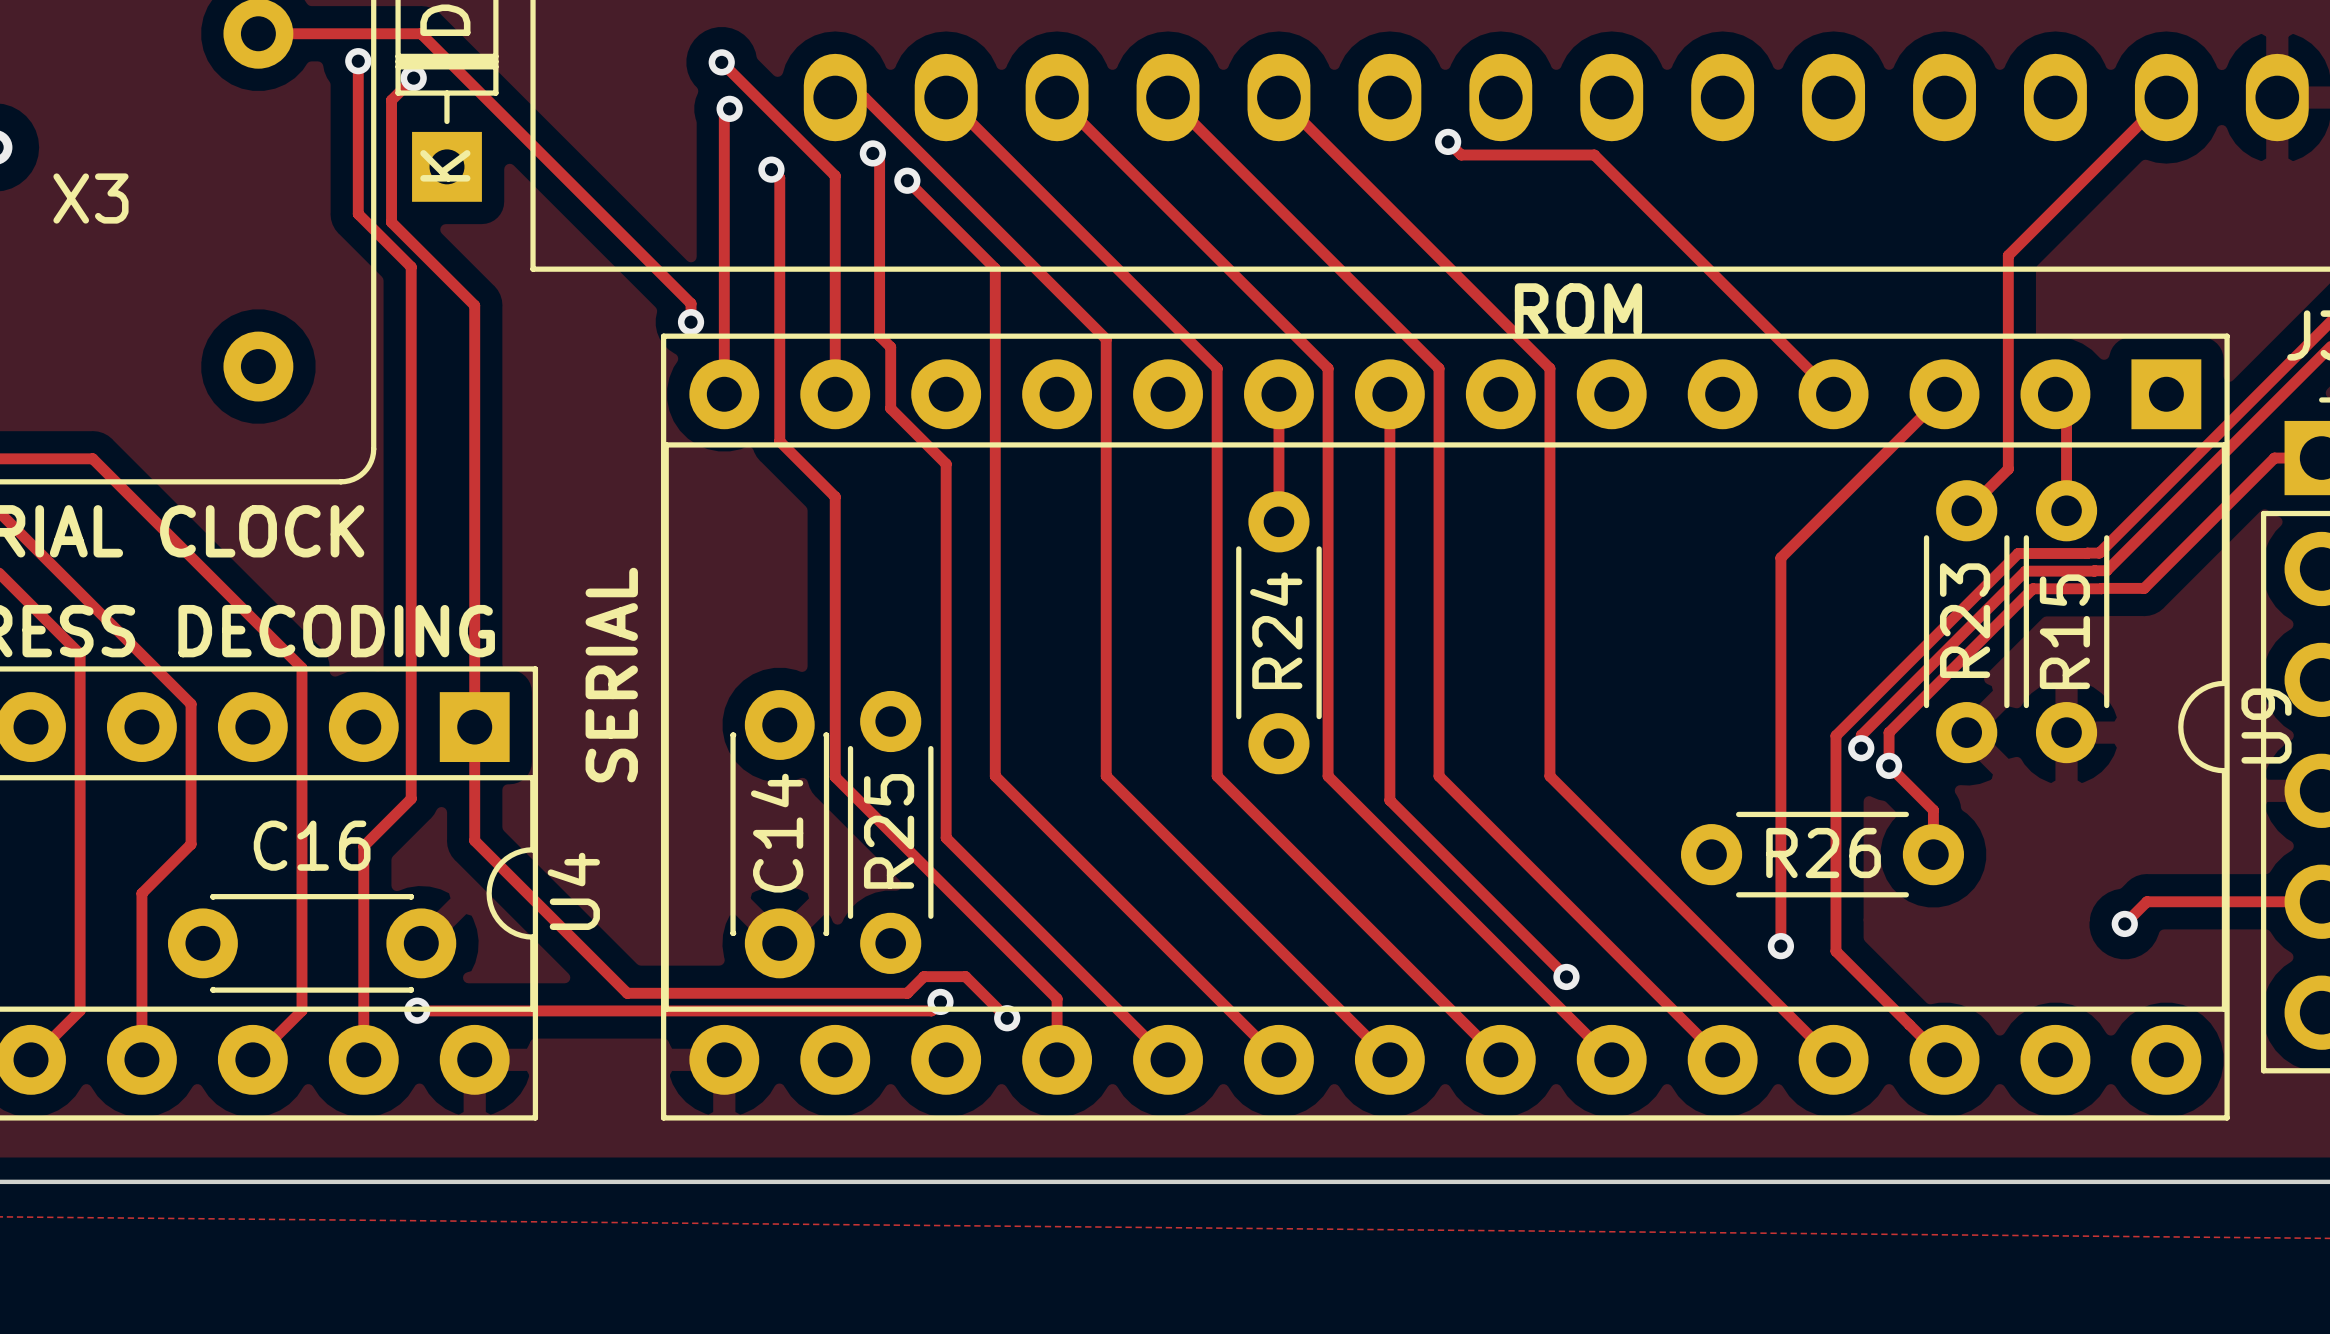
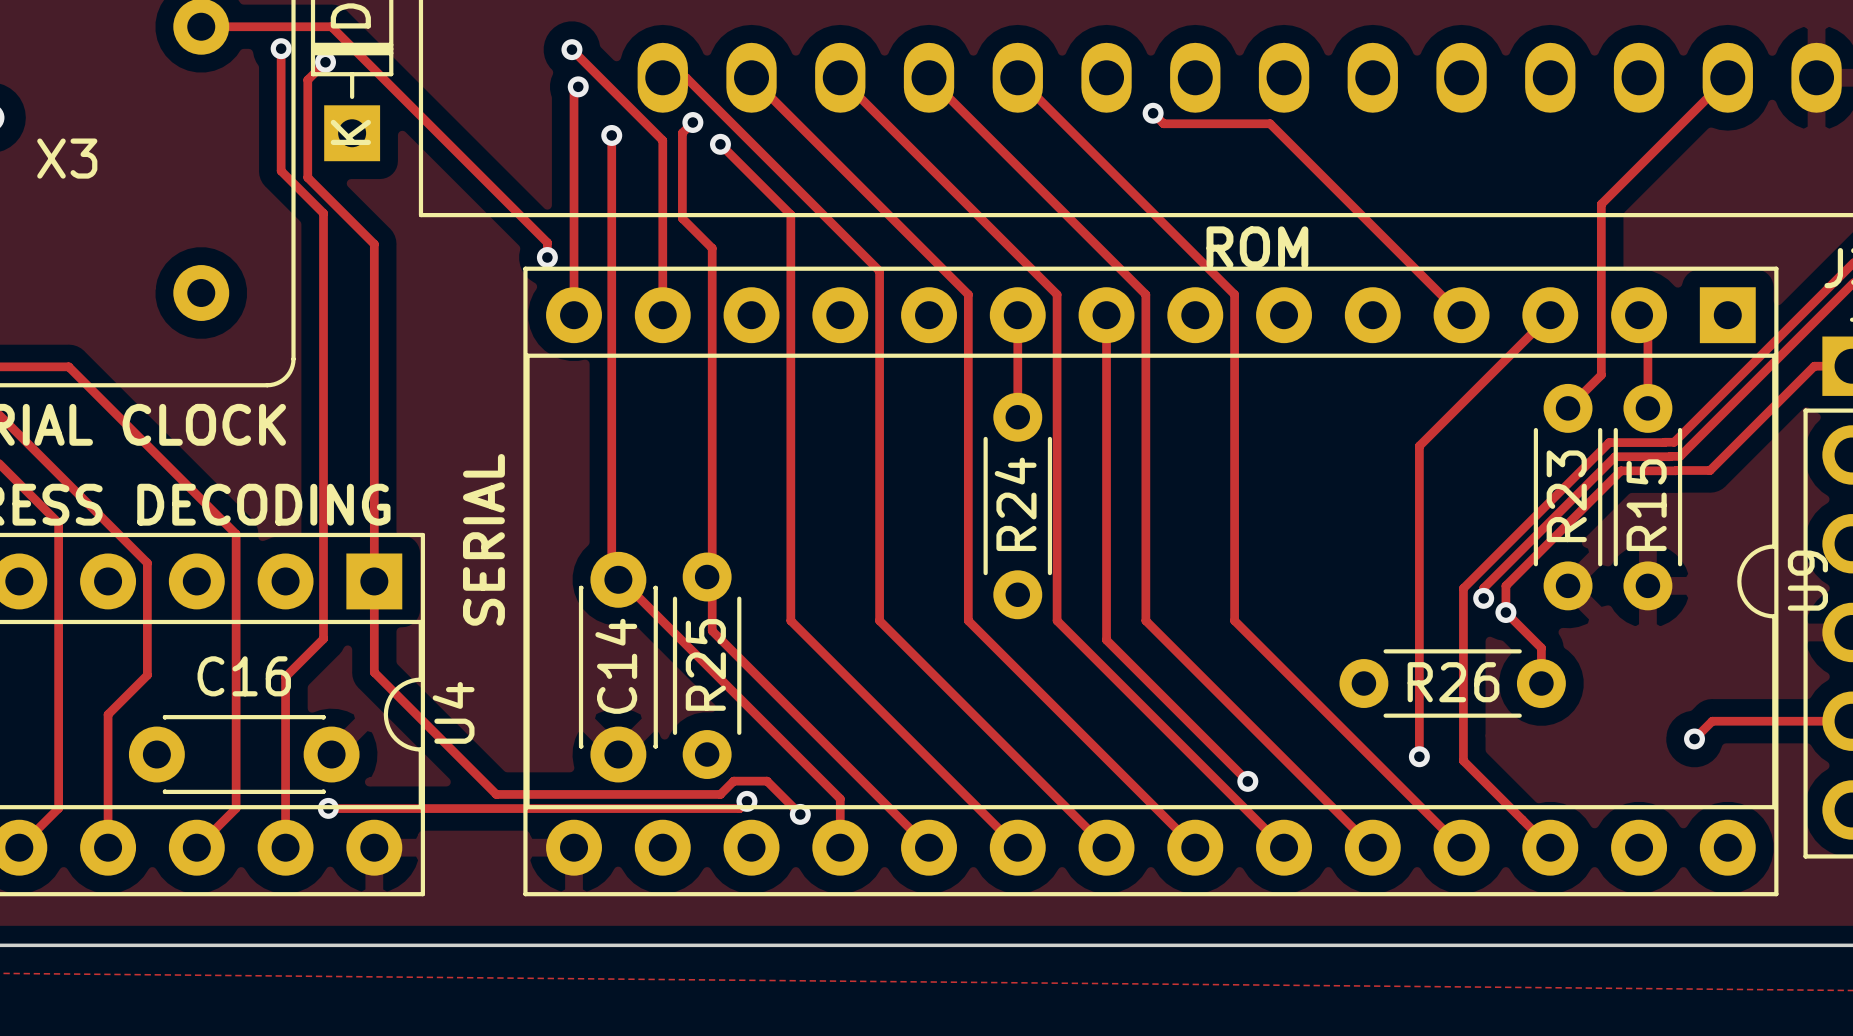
track: (872, 153) (879, 160) (879, 336) (890, 347) (890, 408) (946, 464) (946, 837) -> (692, 122) (682, 132) (682, 218) (712, 248) (712, 630) (751, 670)
track: (771, 169) (779, 177) (779, 441) (835, 496) (835, 776) -> (611, 135) (611, 570) (662, 621)

